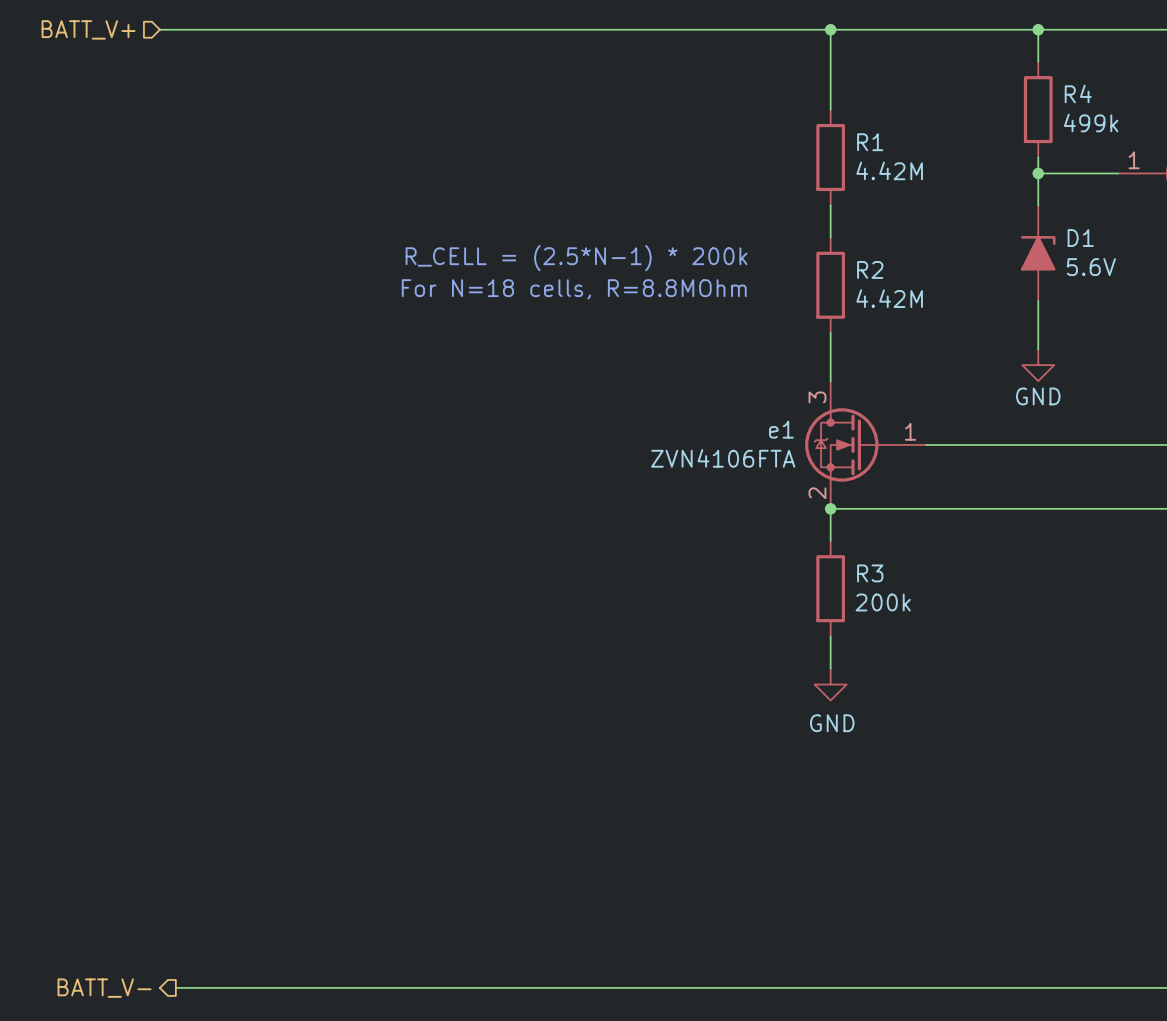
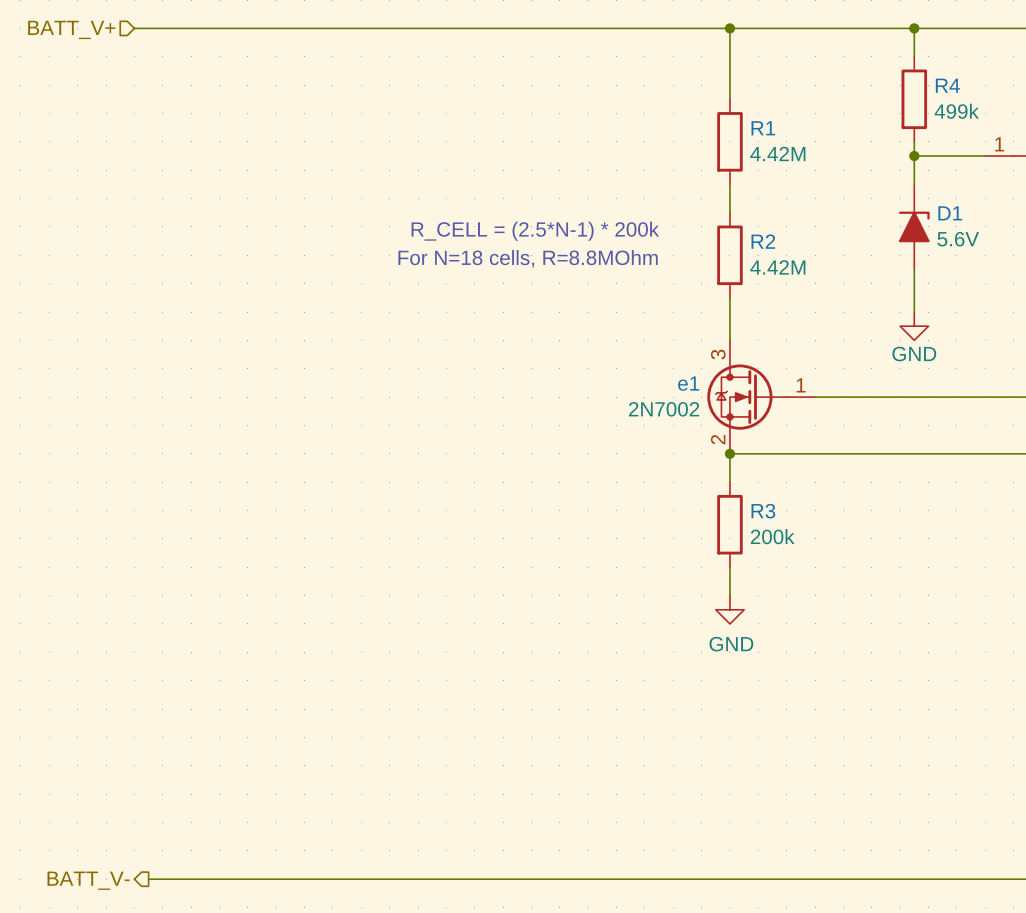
e1 value: ZVN4106FTA (723, 458) -> 2N7002 (664, 409)

